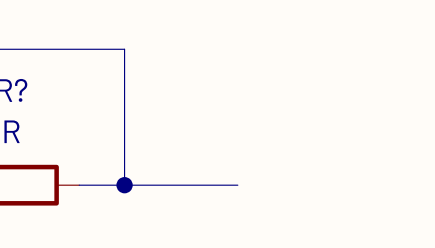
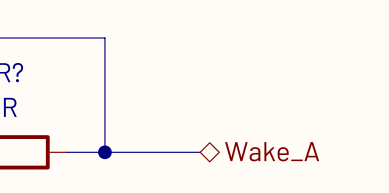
hierarchical label: none -> Wake_A (272, 151)

